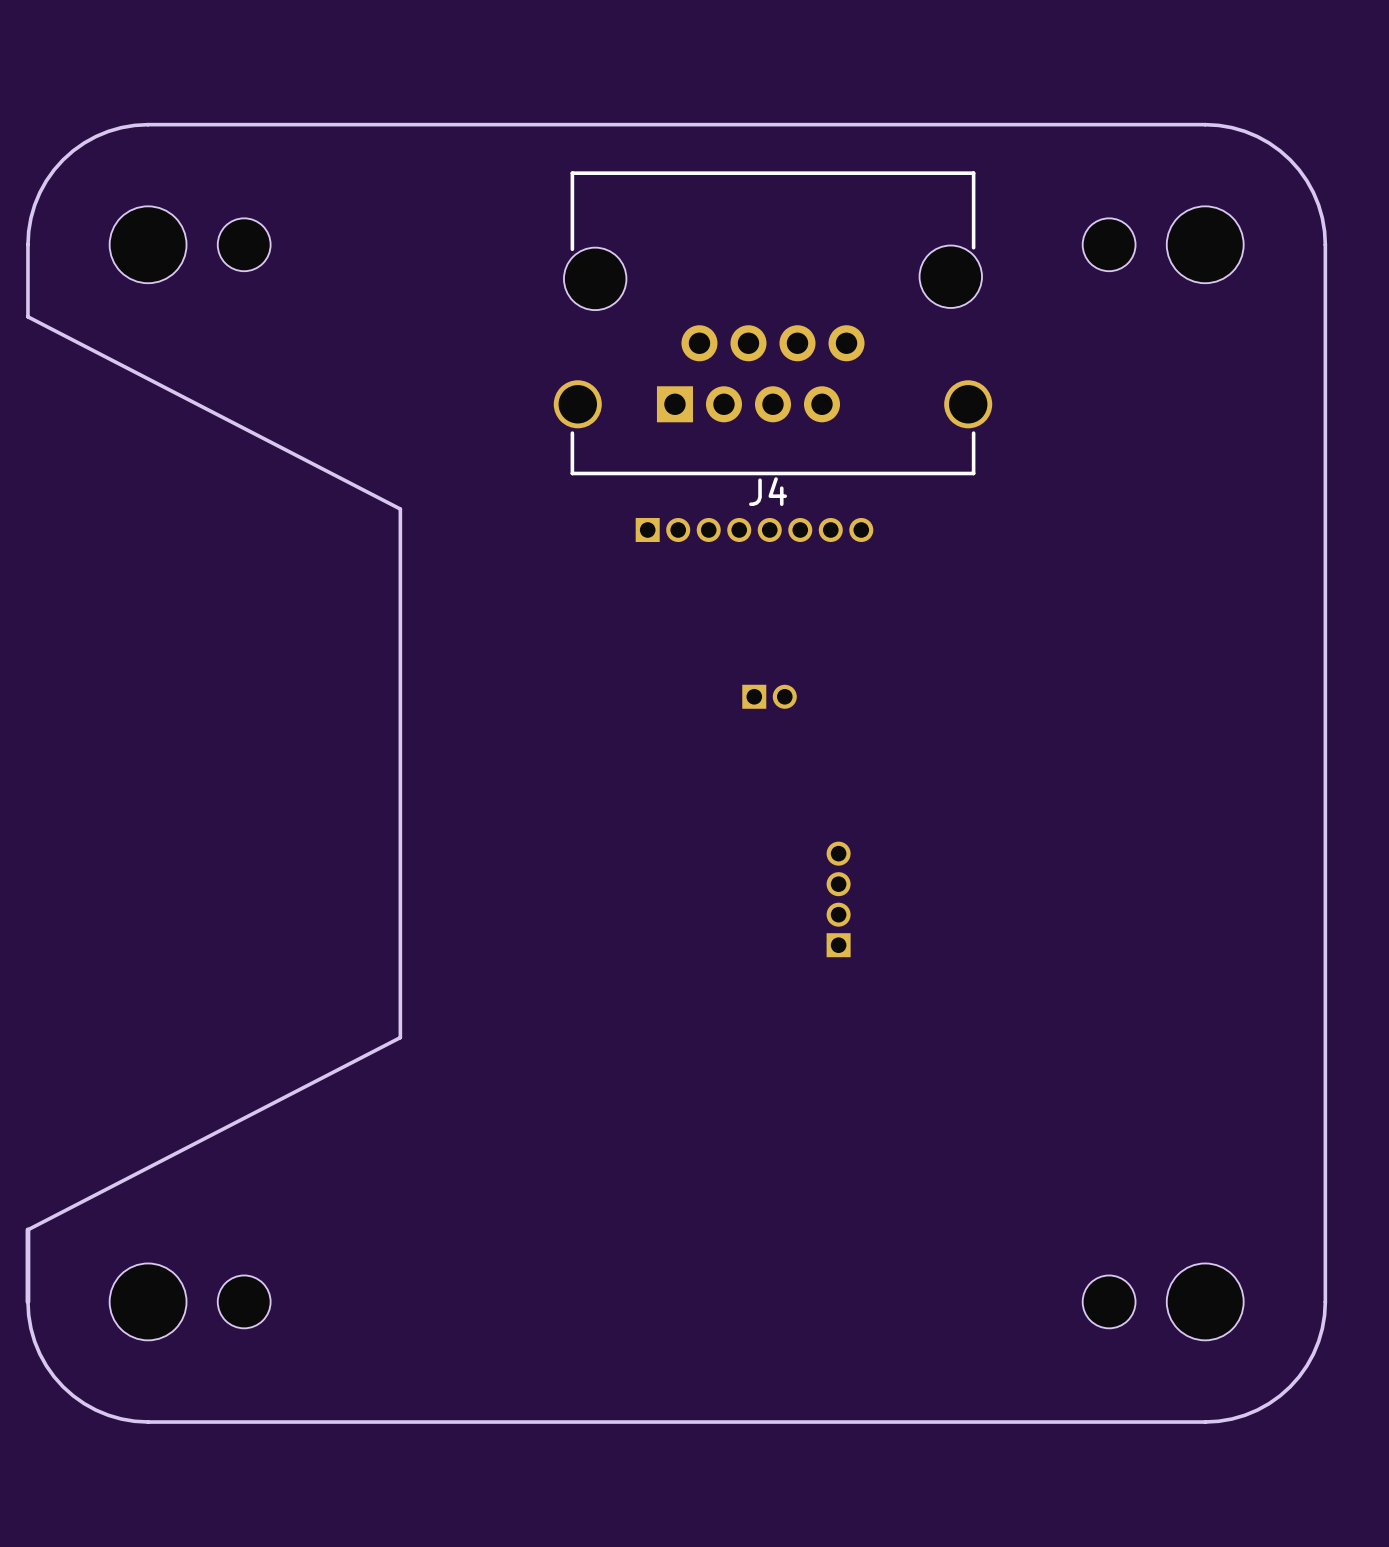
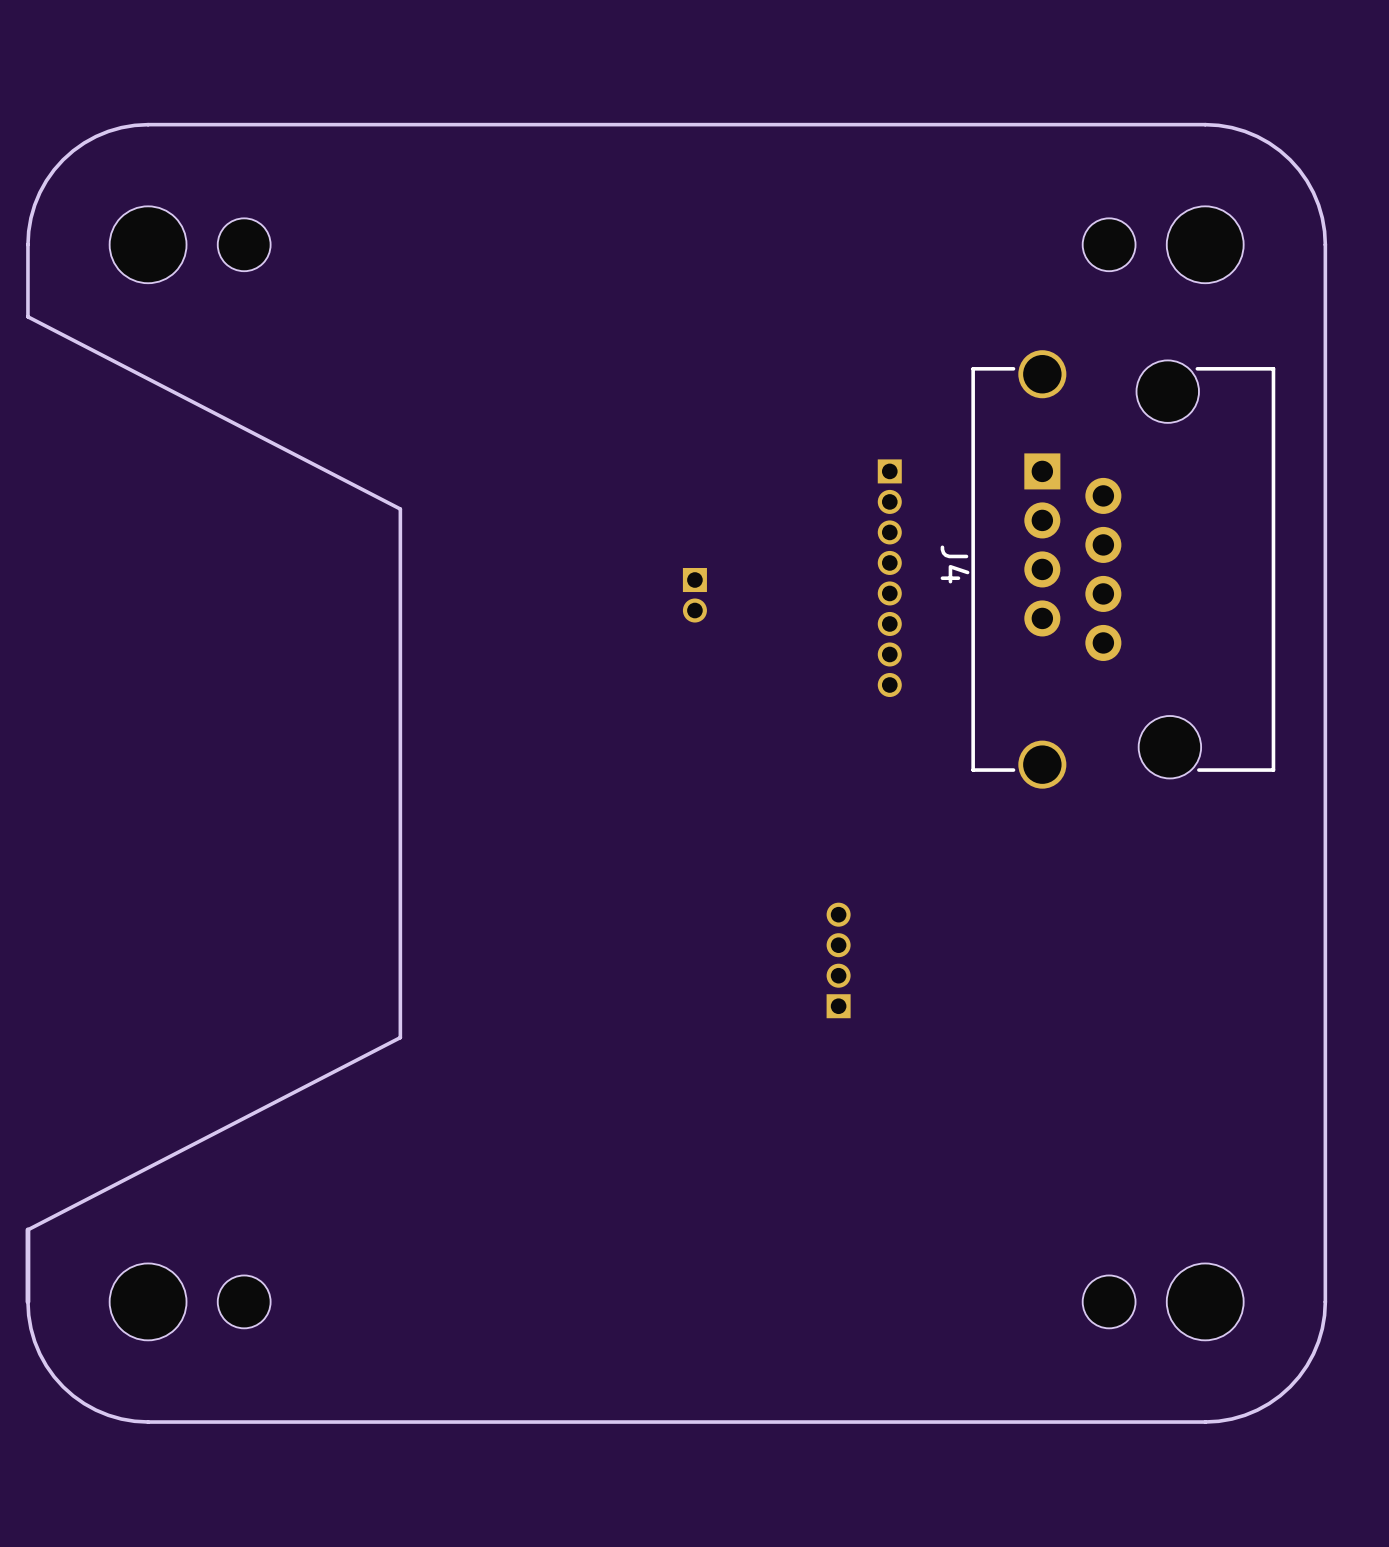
J4 rotation: 0° (772, 323) -> 90° clockwise (1123, 569)
J4 position: (772, 323) -> (1123, 569)
part rotation: 0° (754, 529) -> 90° clockwise (889, 578)
part position: (754, 529) -> (889, 578)
part rotation: 0° (769, 696) -> 90° clockwise (694, 595)
part position: (769, 696) -> (694, 595)
part position: (838, 899) -> (838, 960)

